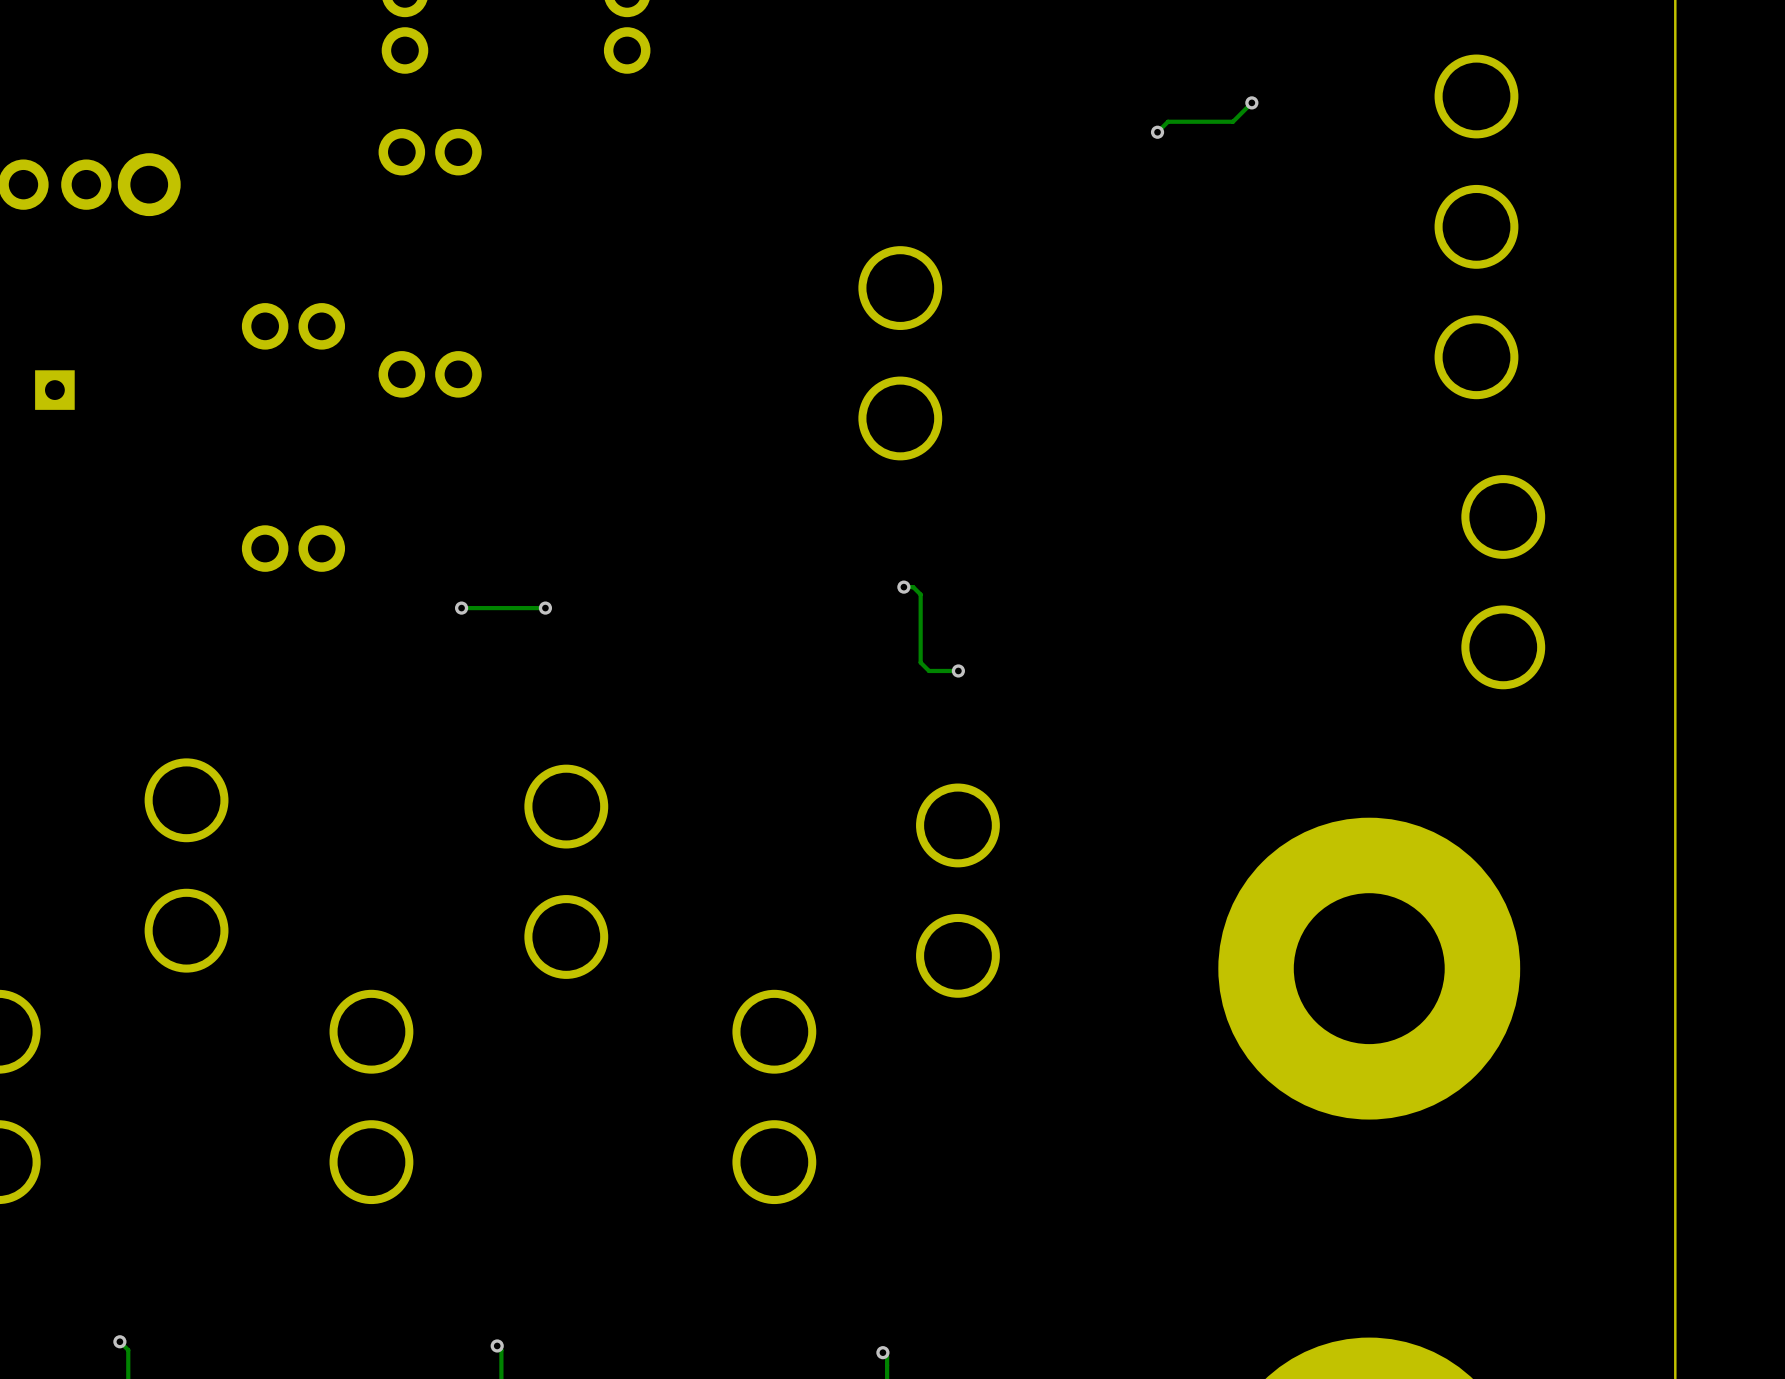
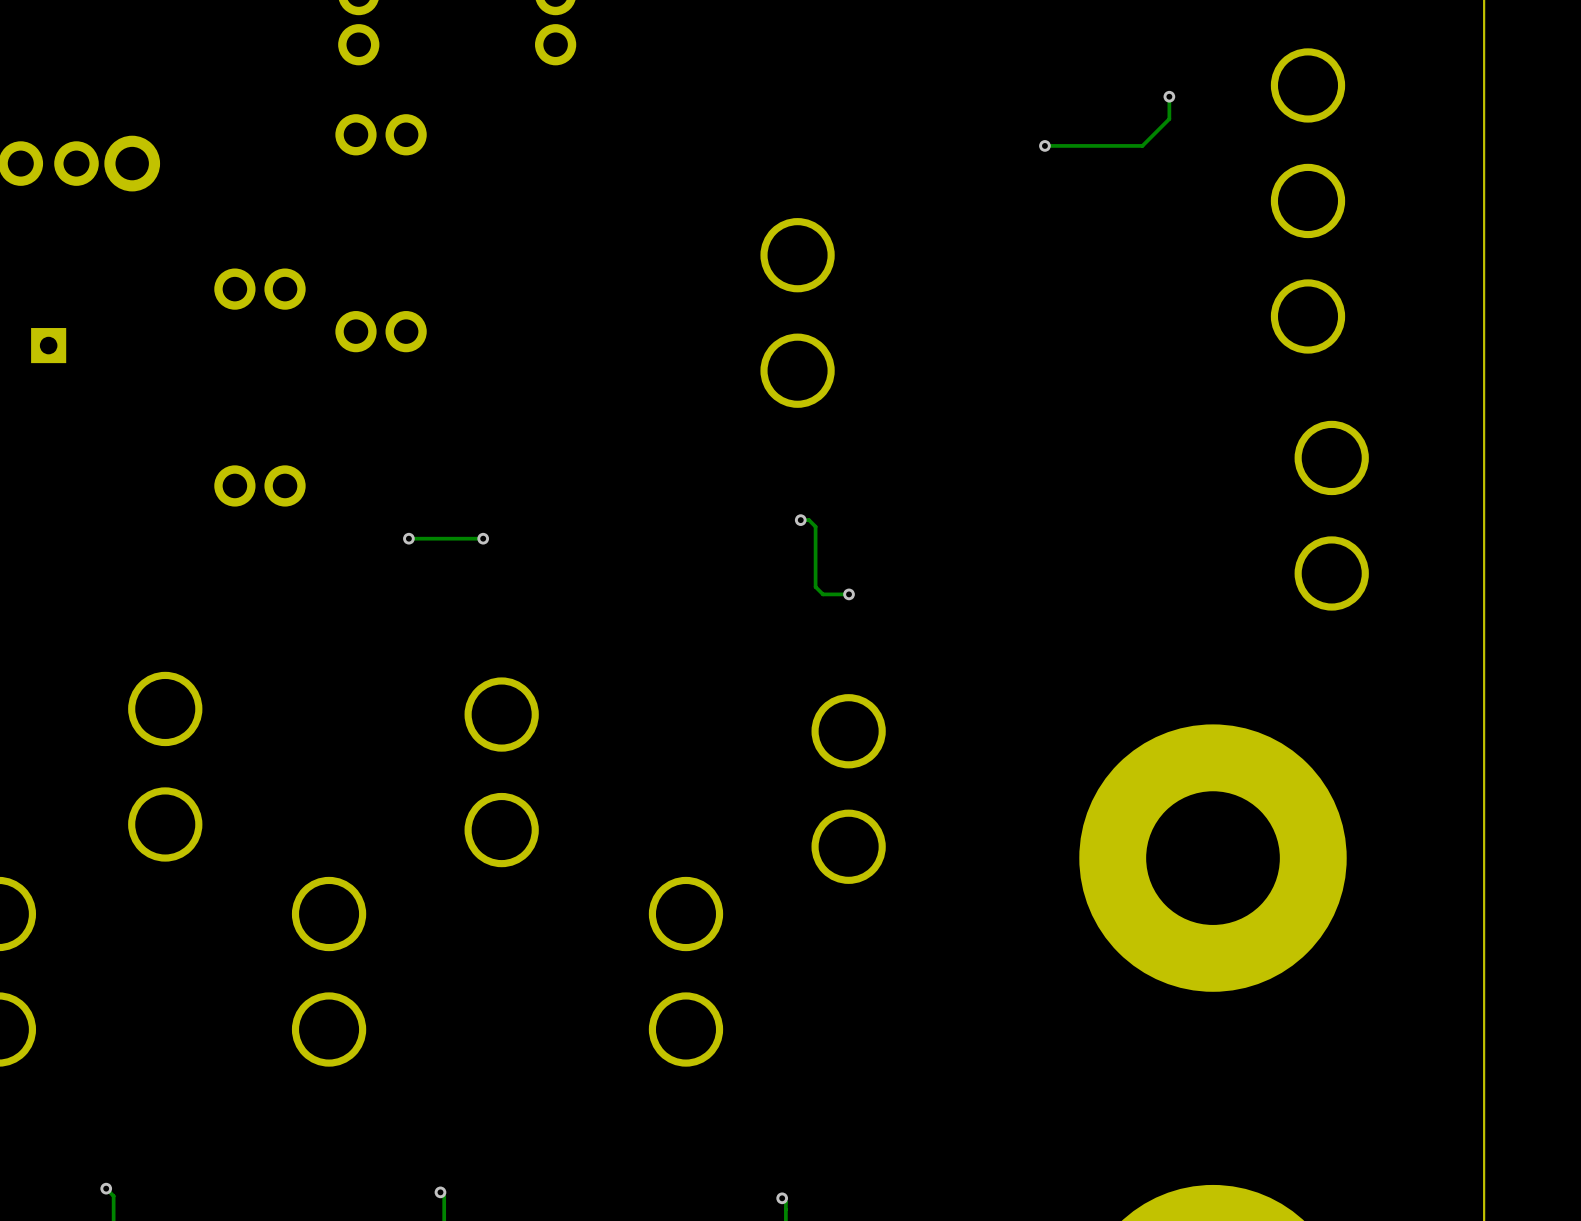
track: (1251, 102) (1232, 121) (1168, 121) (1157, 132) -> none
via: (1251, 102) -> none
track: none -> (1169, 96) (1169, 119) (1142, 145) (1044, 145)
via: none -> (1169, 96)
via position: (1157, 132) -> (1044, 145)

